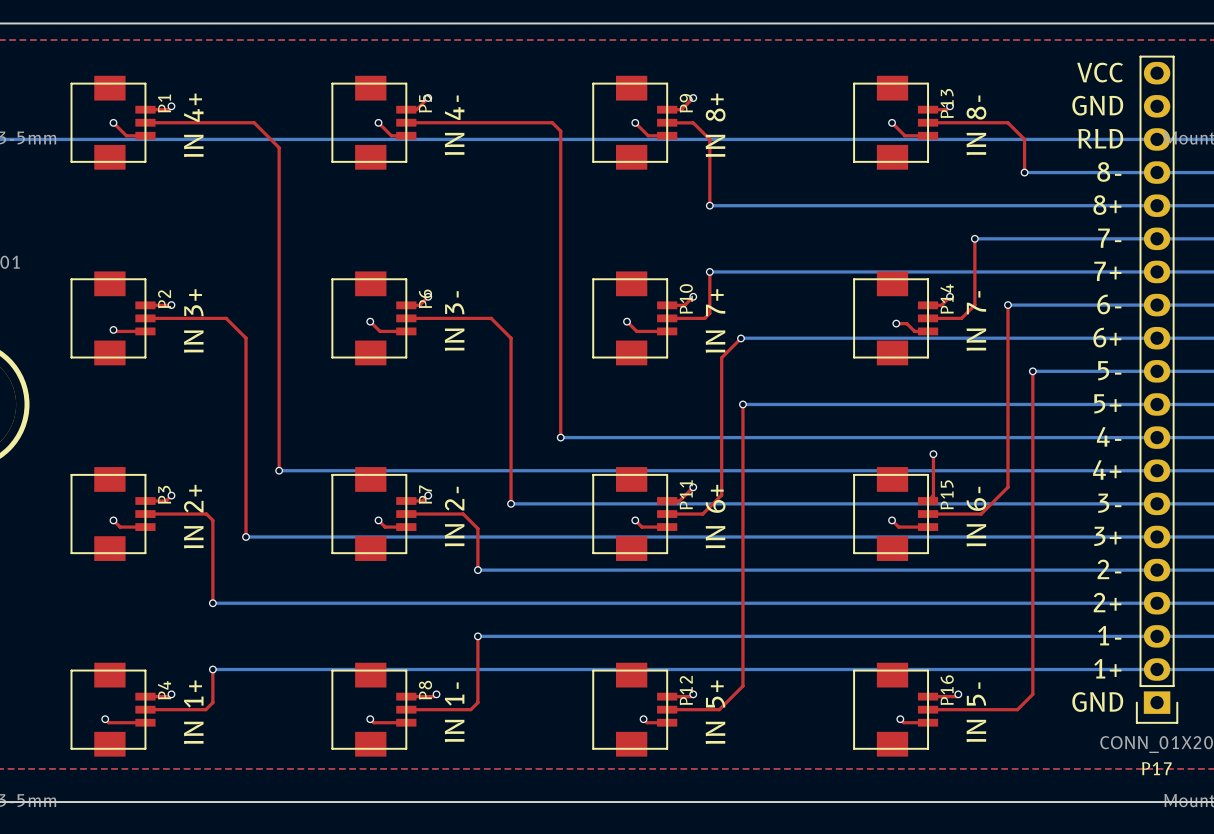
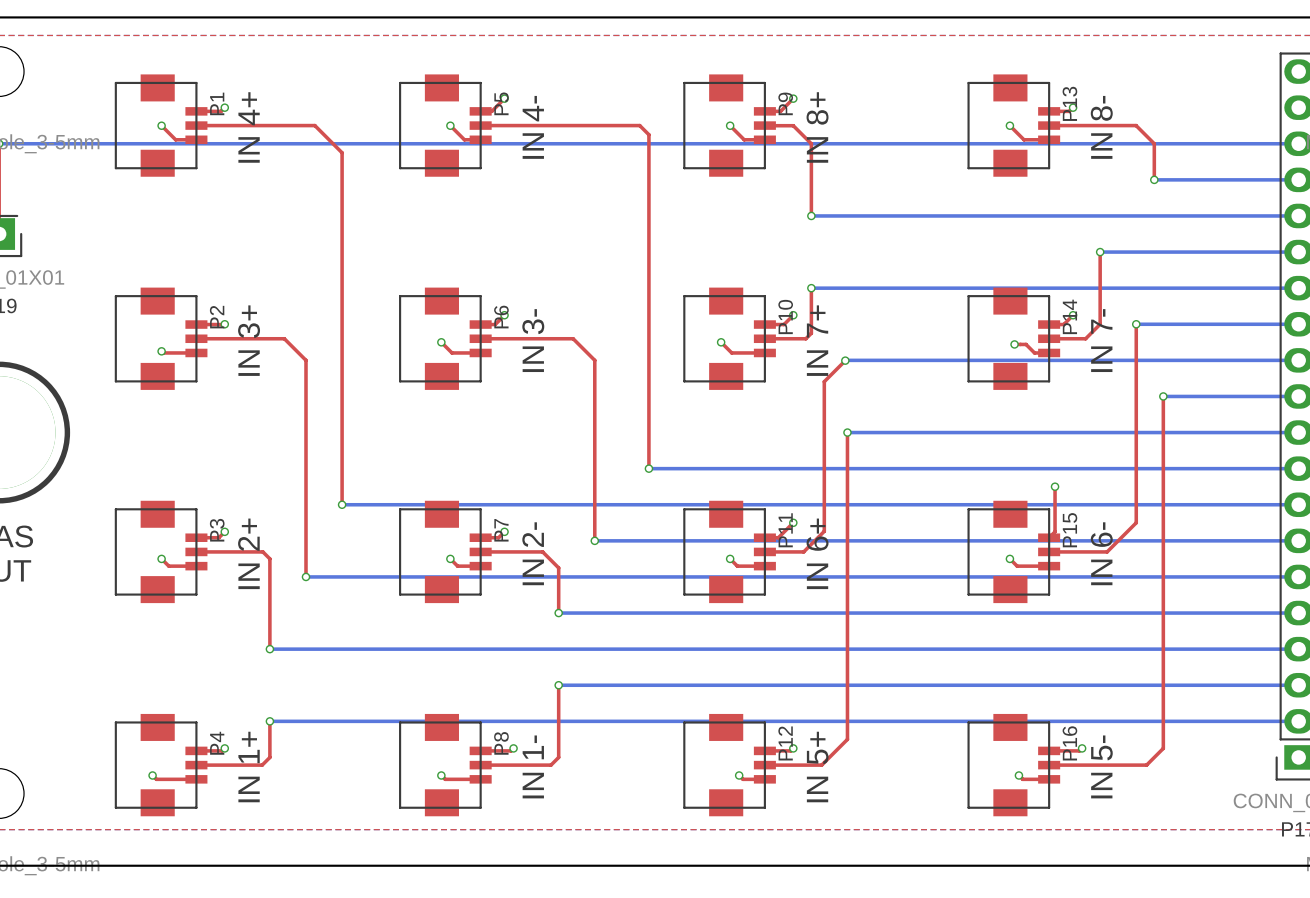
text: VCC (1100, 72) -> none
text: GND (1097, 105) -> none
text: RLD (1100, 138) -> none
text: 8- (1109, 171) -> none
text: 8+ (1107, 205) -> none
text: 7- (1109, 238) -> none
text: 7+ (1107, 271) -> none
text: 6- (1109, 304) -> none
text: 6+ (1107, 337) -> none
text: 5- (1109, 370) -> none
text: 5+ (1107, 403) -> none
text: 4- (1109, 436) -> none
text: 4+ (1107, 469) -> none
text: 3- (1109, 503) -> none
text: 3+ (1107, 536) -> none
text: 2- (1109, 569) -> none
text: 2+ (1107, 602) -> none
text: 1- (1109, 635) -> none
text: 1+ (1107, 668) -> none
text: GND (1097, 702) -> none

